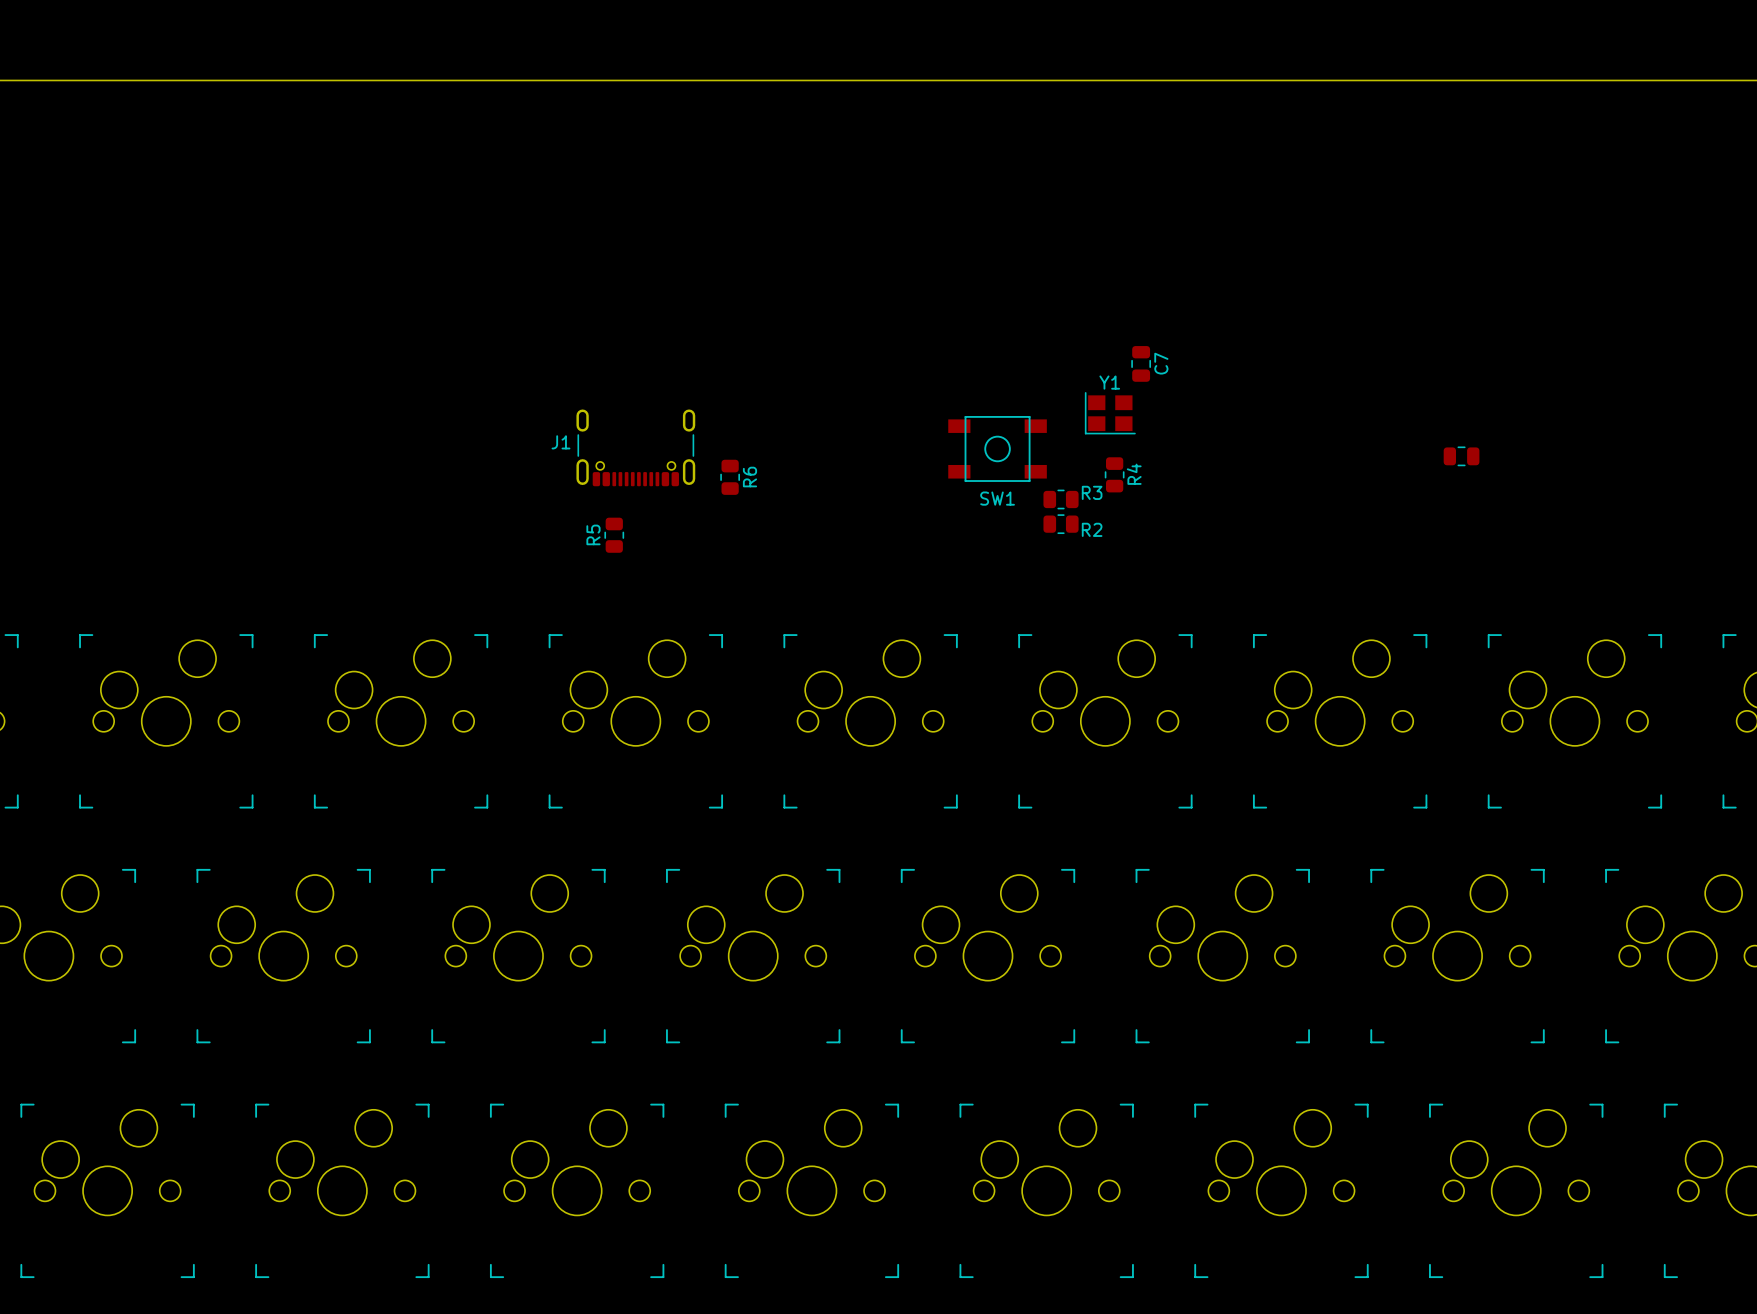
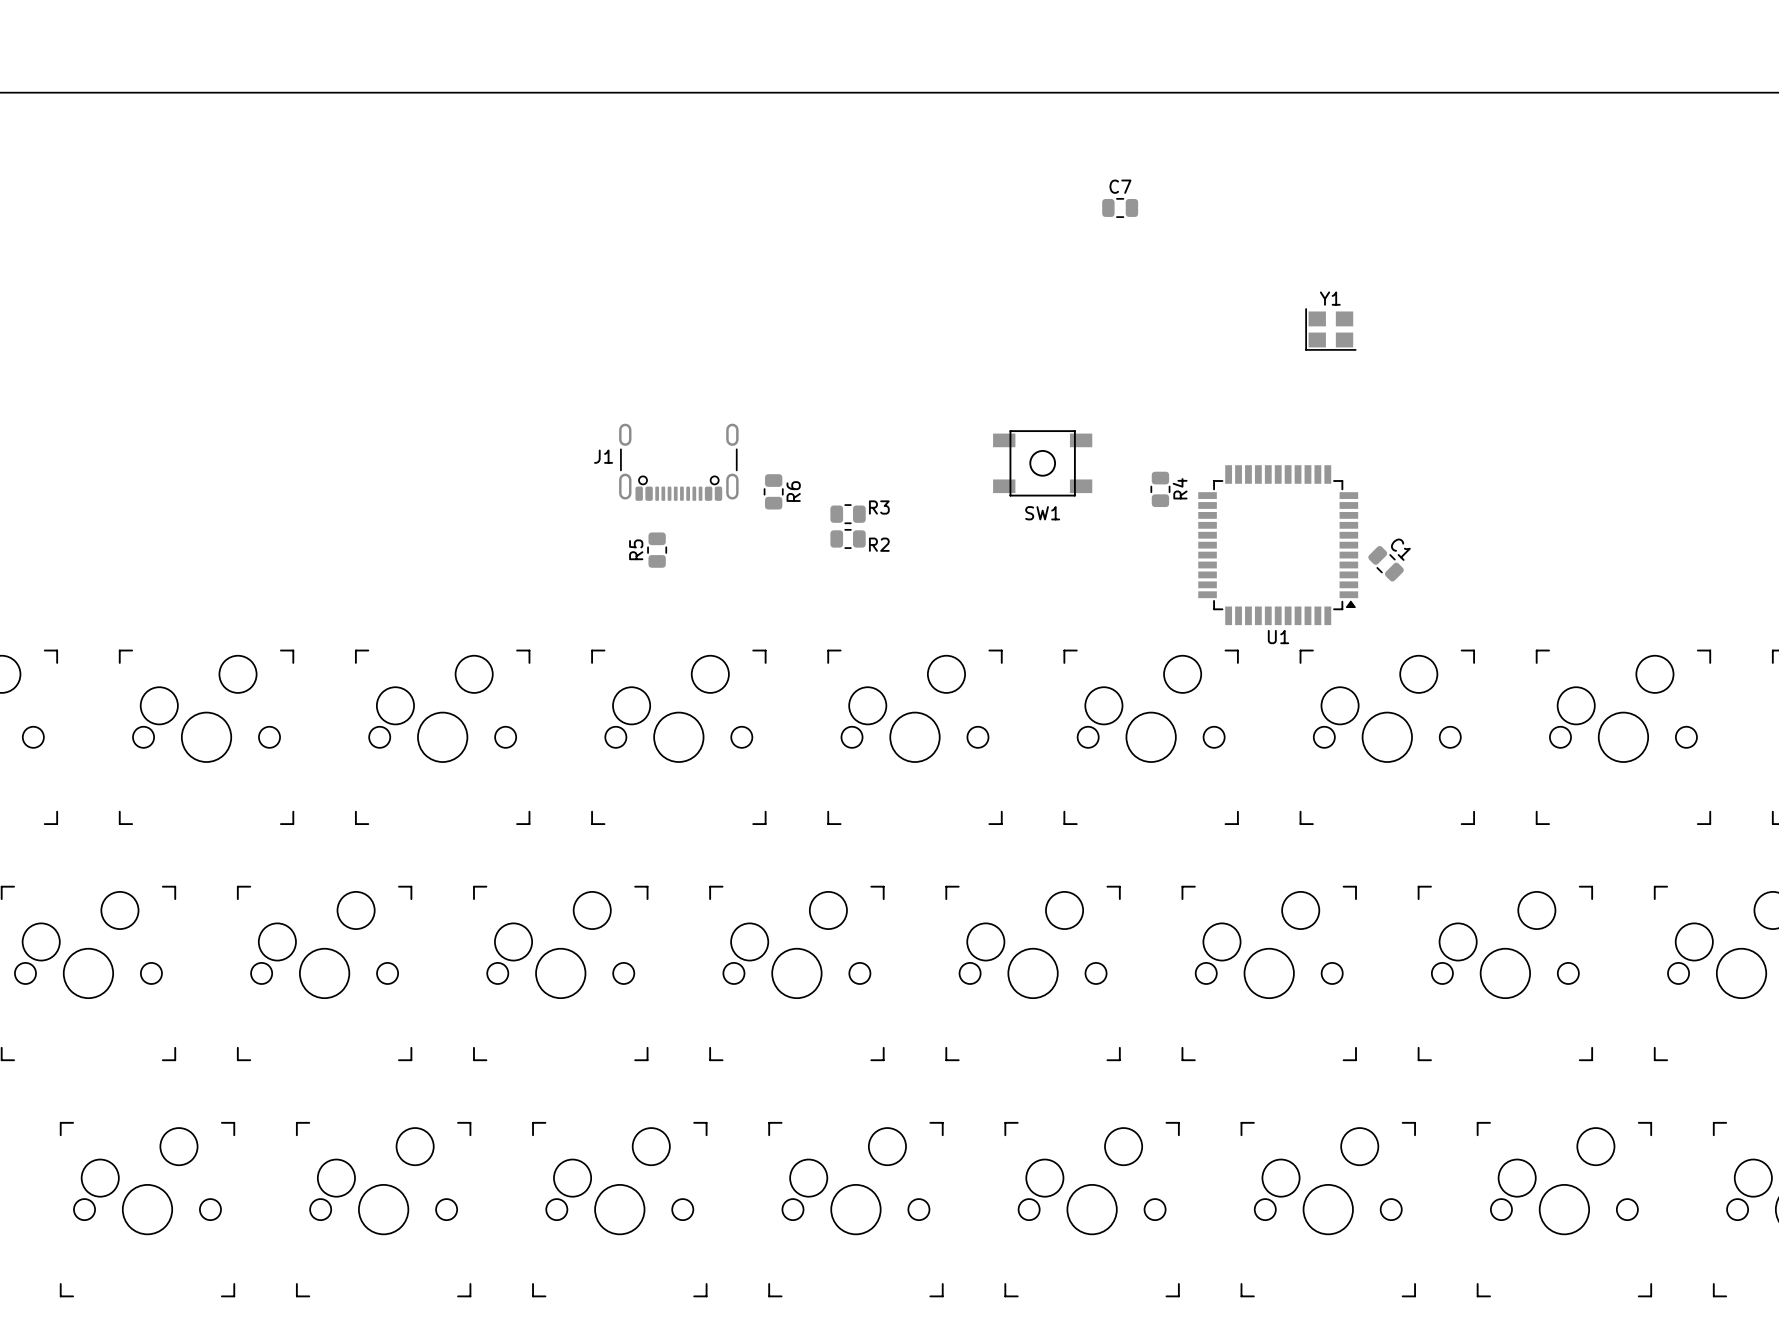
C7 rotation: 0° (1141, 363) -> 90° clockwise (1120, 207)
C7 position: (1141, 363) -> (1120, 207)
C7 name position: C7 (1161, 363) -> C7 (1120, 186)
Y1 position: (1110, 413) -> (1330, 329)
part: (1461, 456) -> none
R3 position: (1061, 499) -> (848, 514)
R2 position: (1061, 524) -> (848, 538)
U1: none -> (1278, 545)
C1: none -> (1386, 563)

